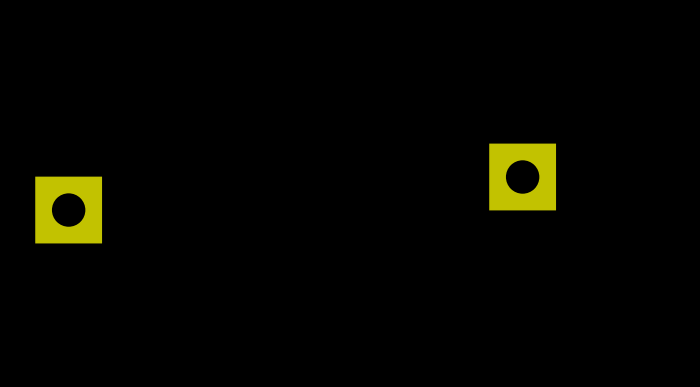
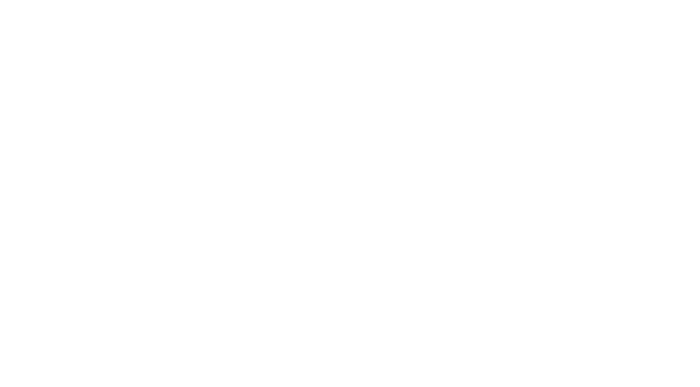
part: (522, 177) -> none
part: (68, 210) -> none

